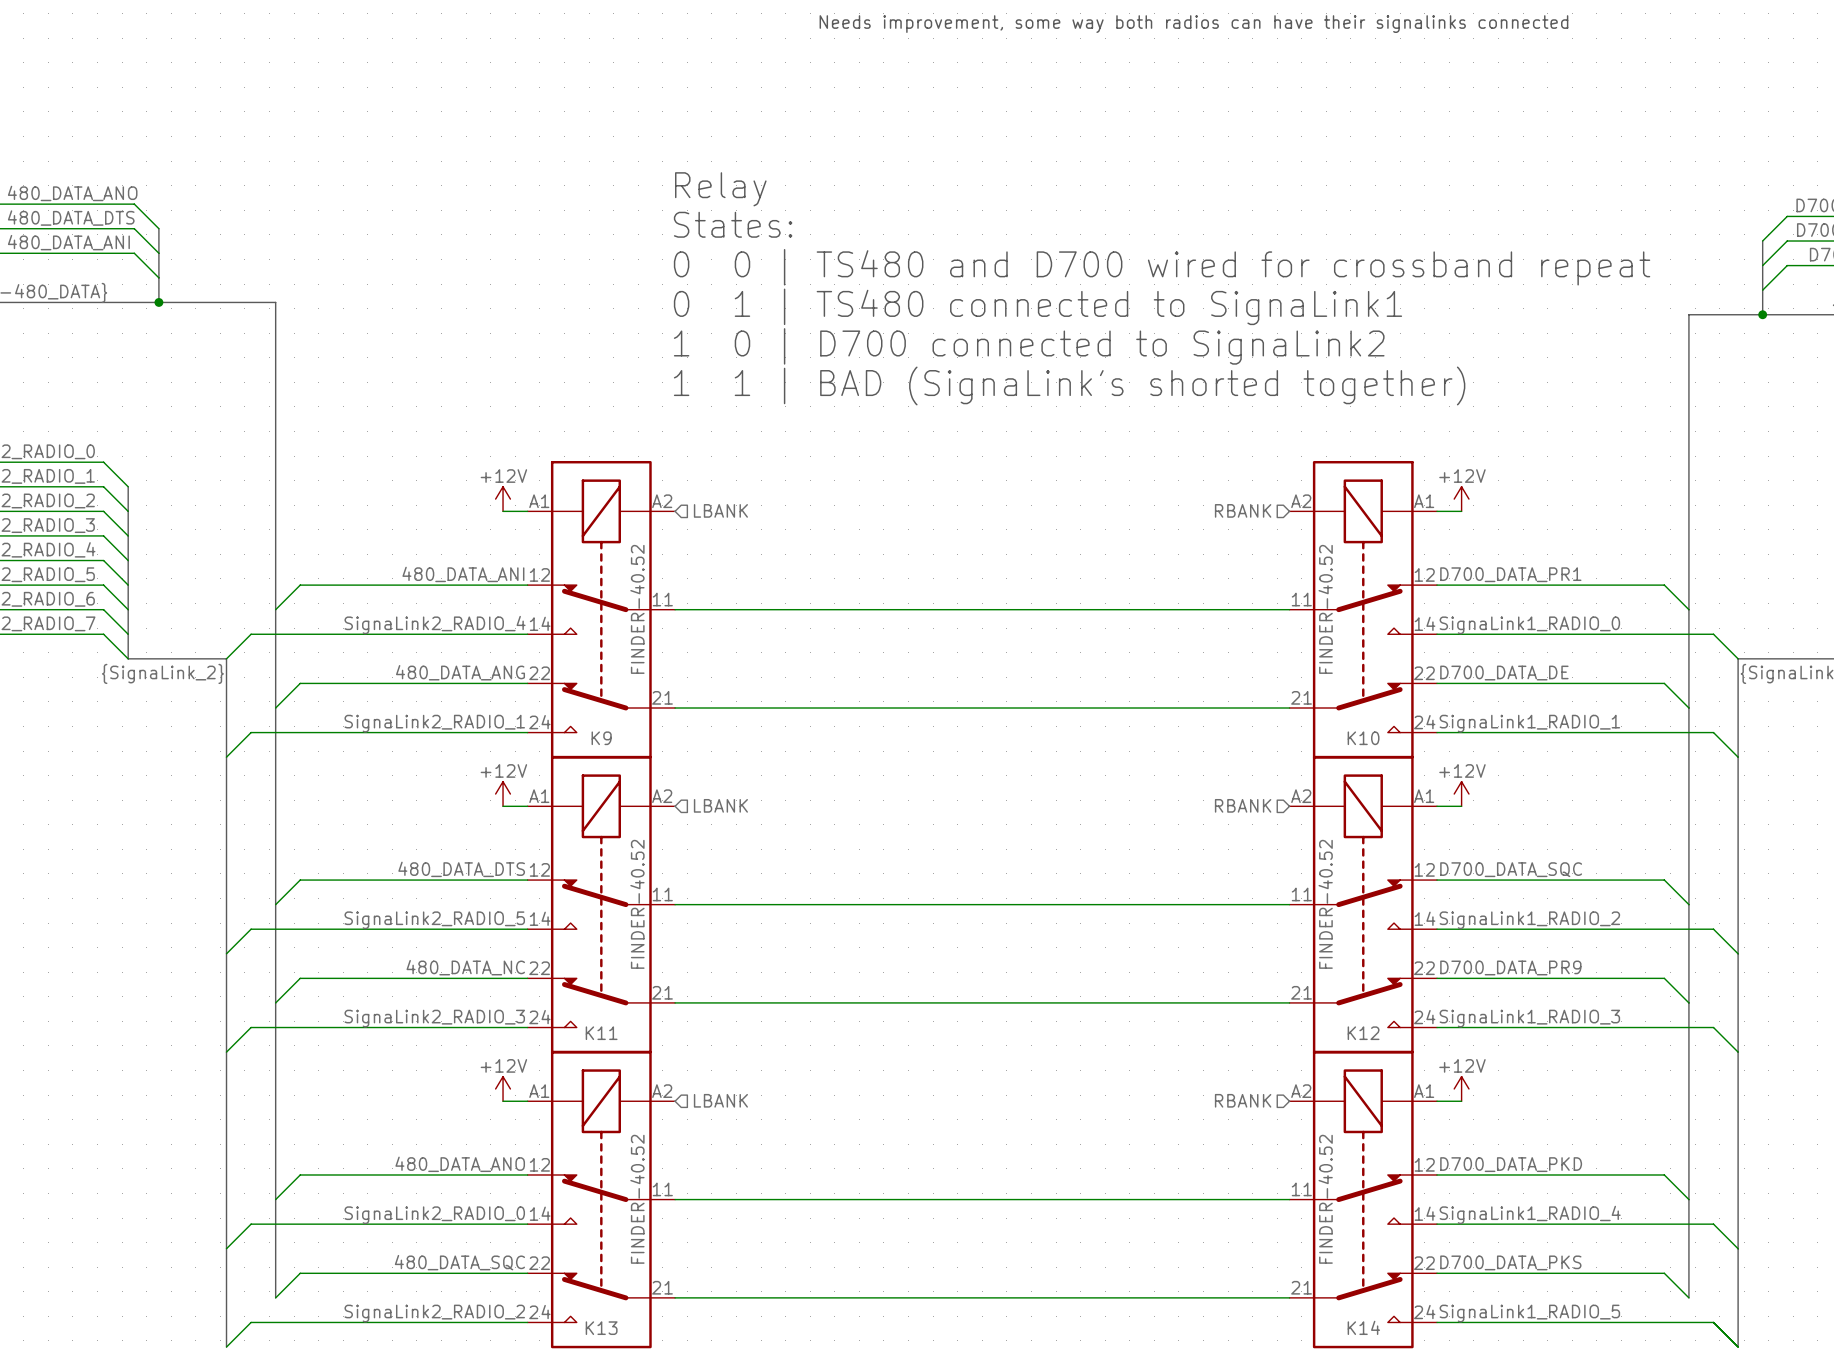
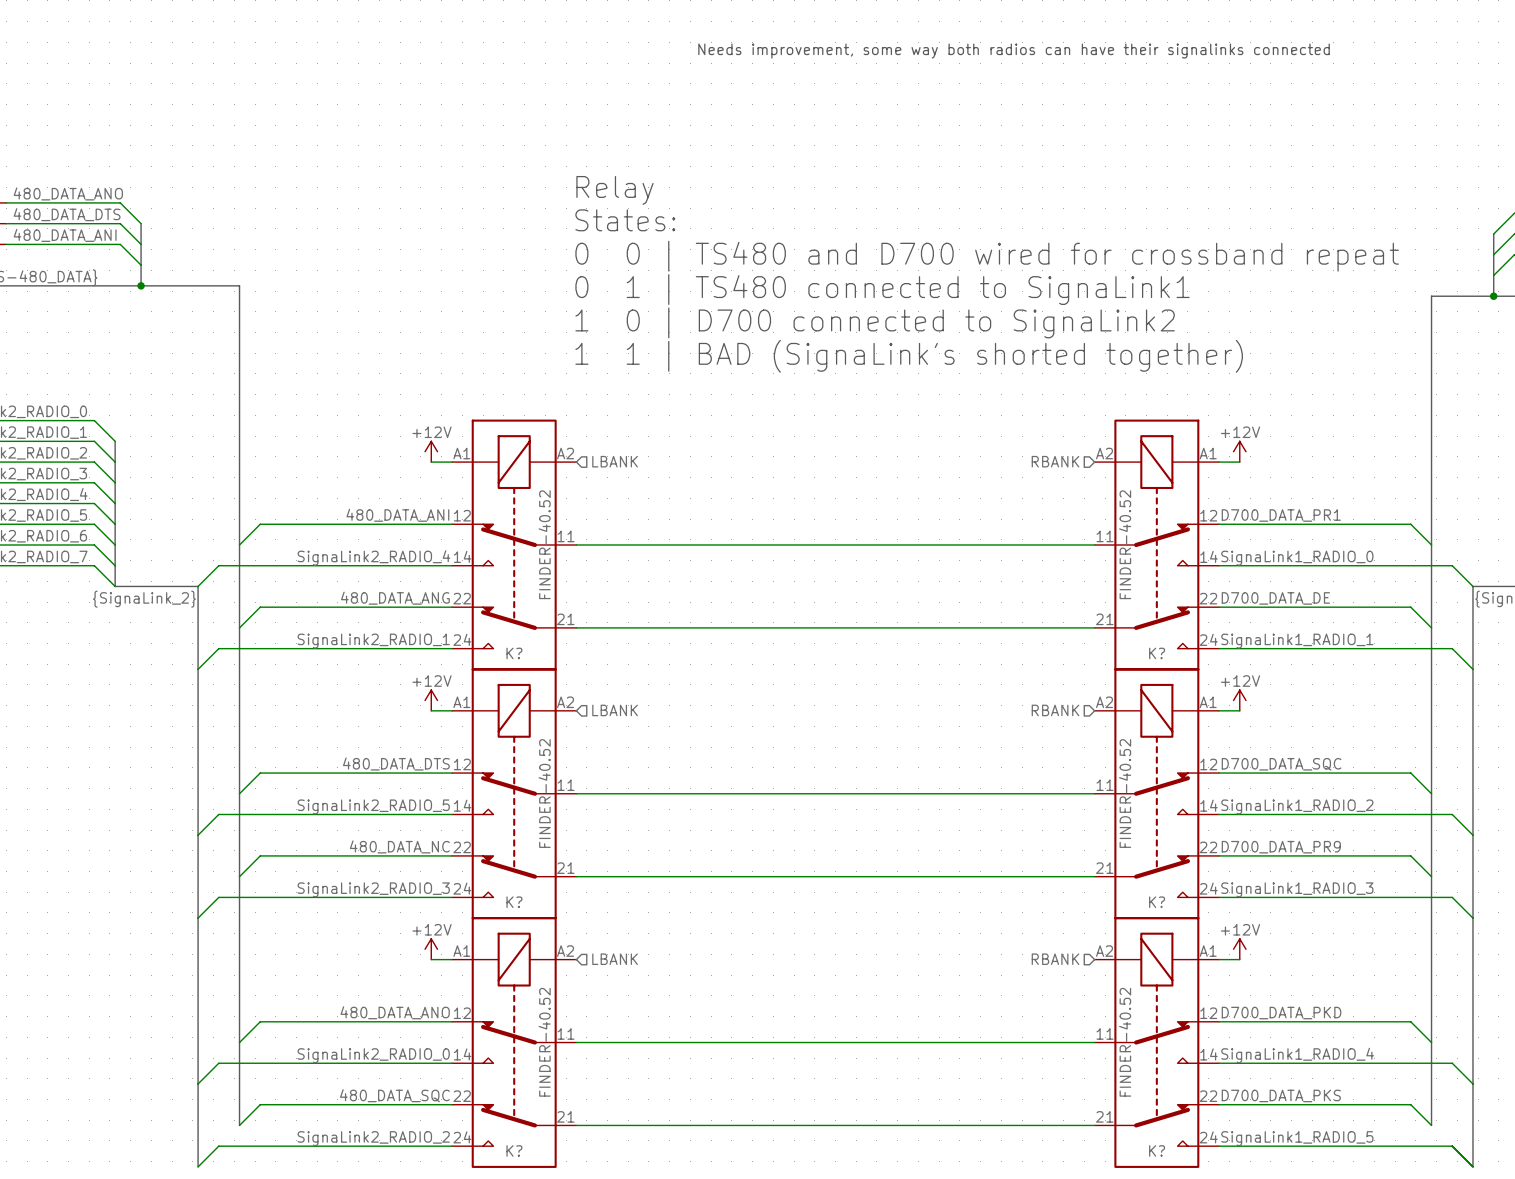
K9 name: K9 (601, 738) -> K? (514, 653)
K10 name: K10 (1363, 738) -> K? (1157, 653)
K11 name: K11 (601, 1033) -> K? (514, 902)
K12 name: K12 (1363, 1033) -> K? (1157, 902)
K14 name: K14 (1363, 1327) -> K? (1157, 1150)
K13 name: K13 (601, 1328) -> K? (514, 1150)

